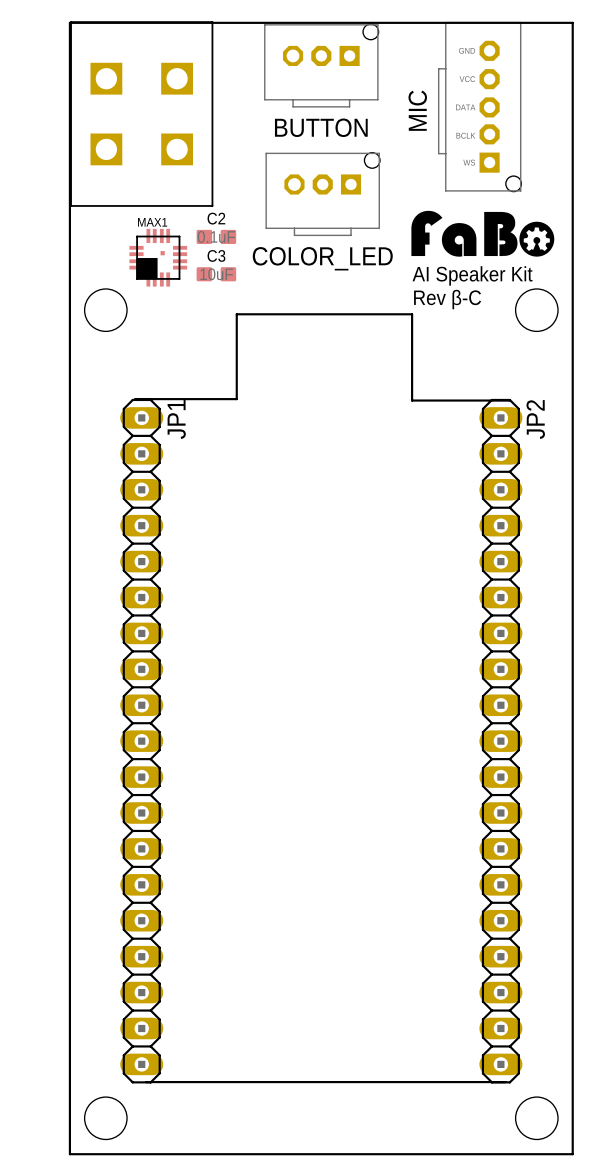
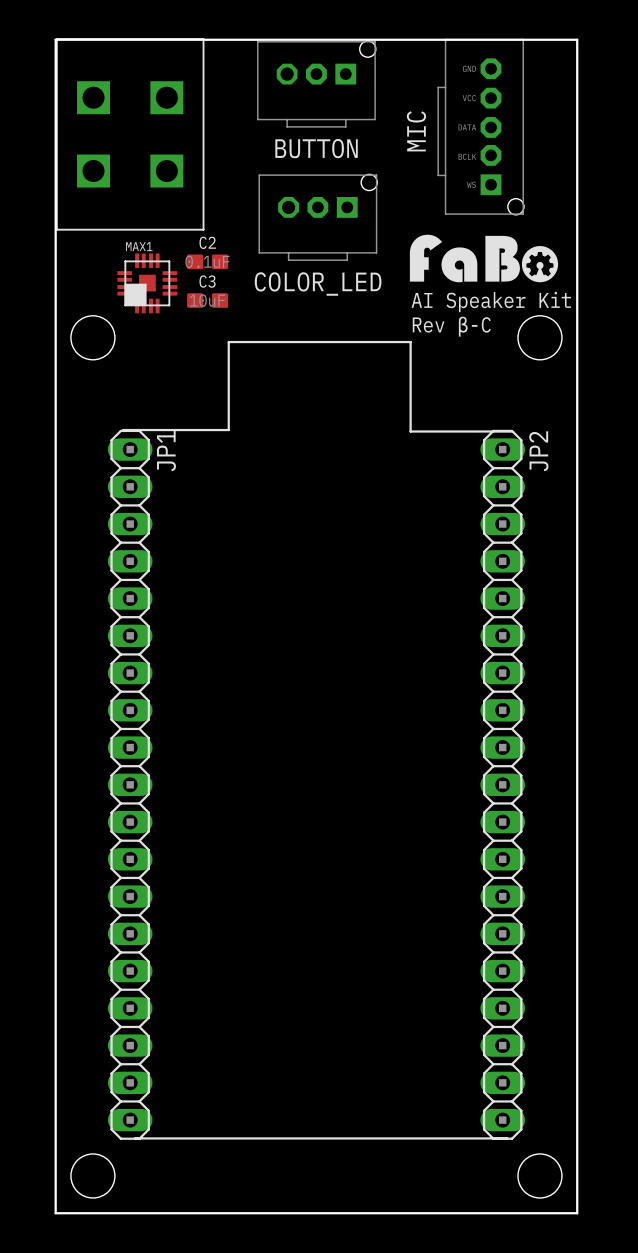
MAX1 footprint: [129, 228, 188, 287] -> [117, 253, 178, 314]

